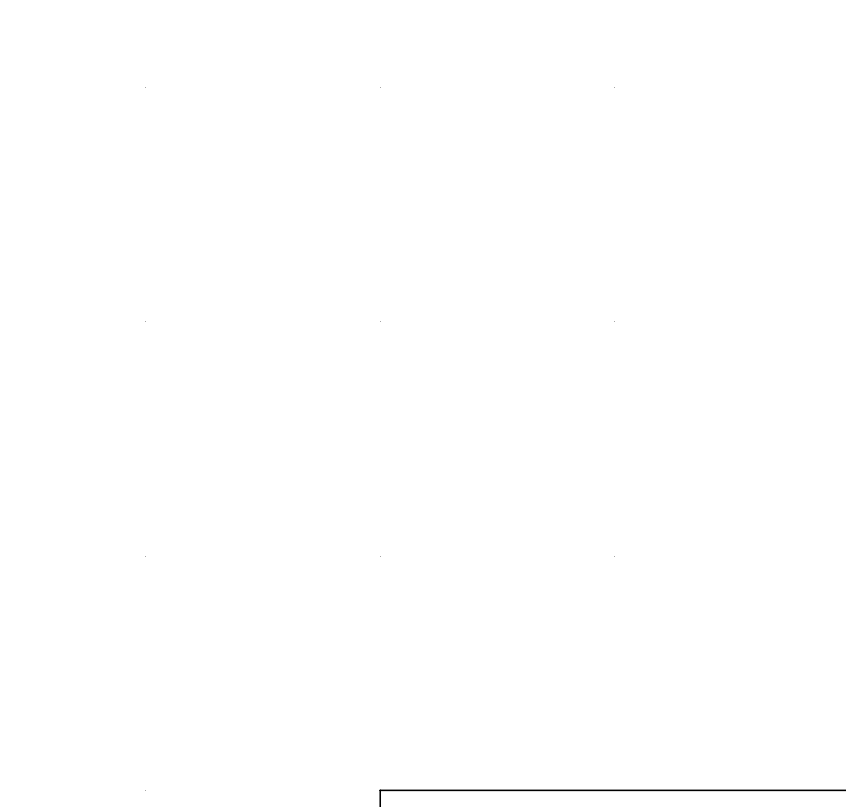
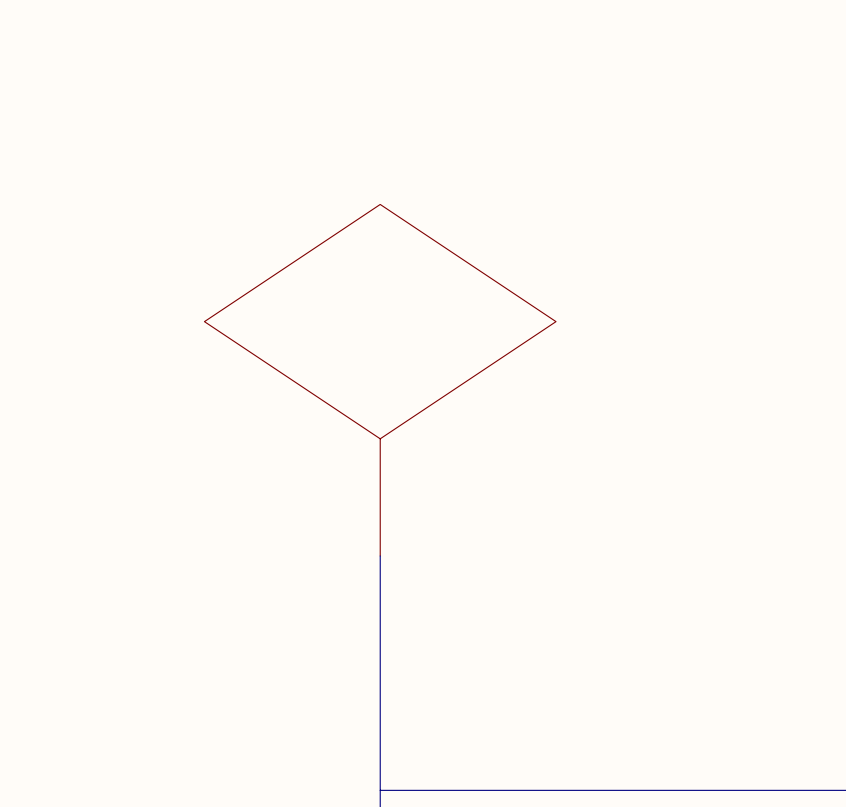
power symbol: none -> (380, 380)
wire: none -> (380, 556) (380, 790)

